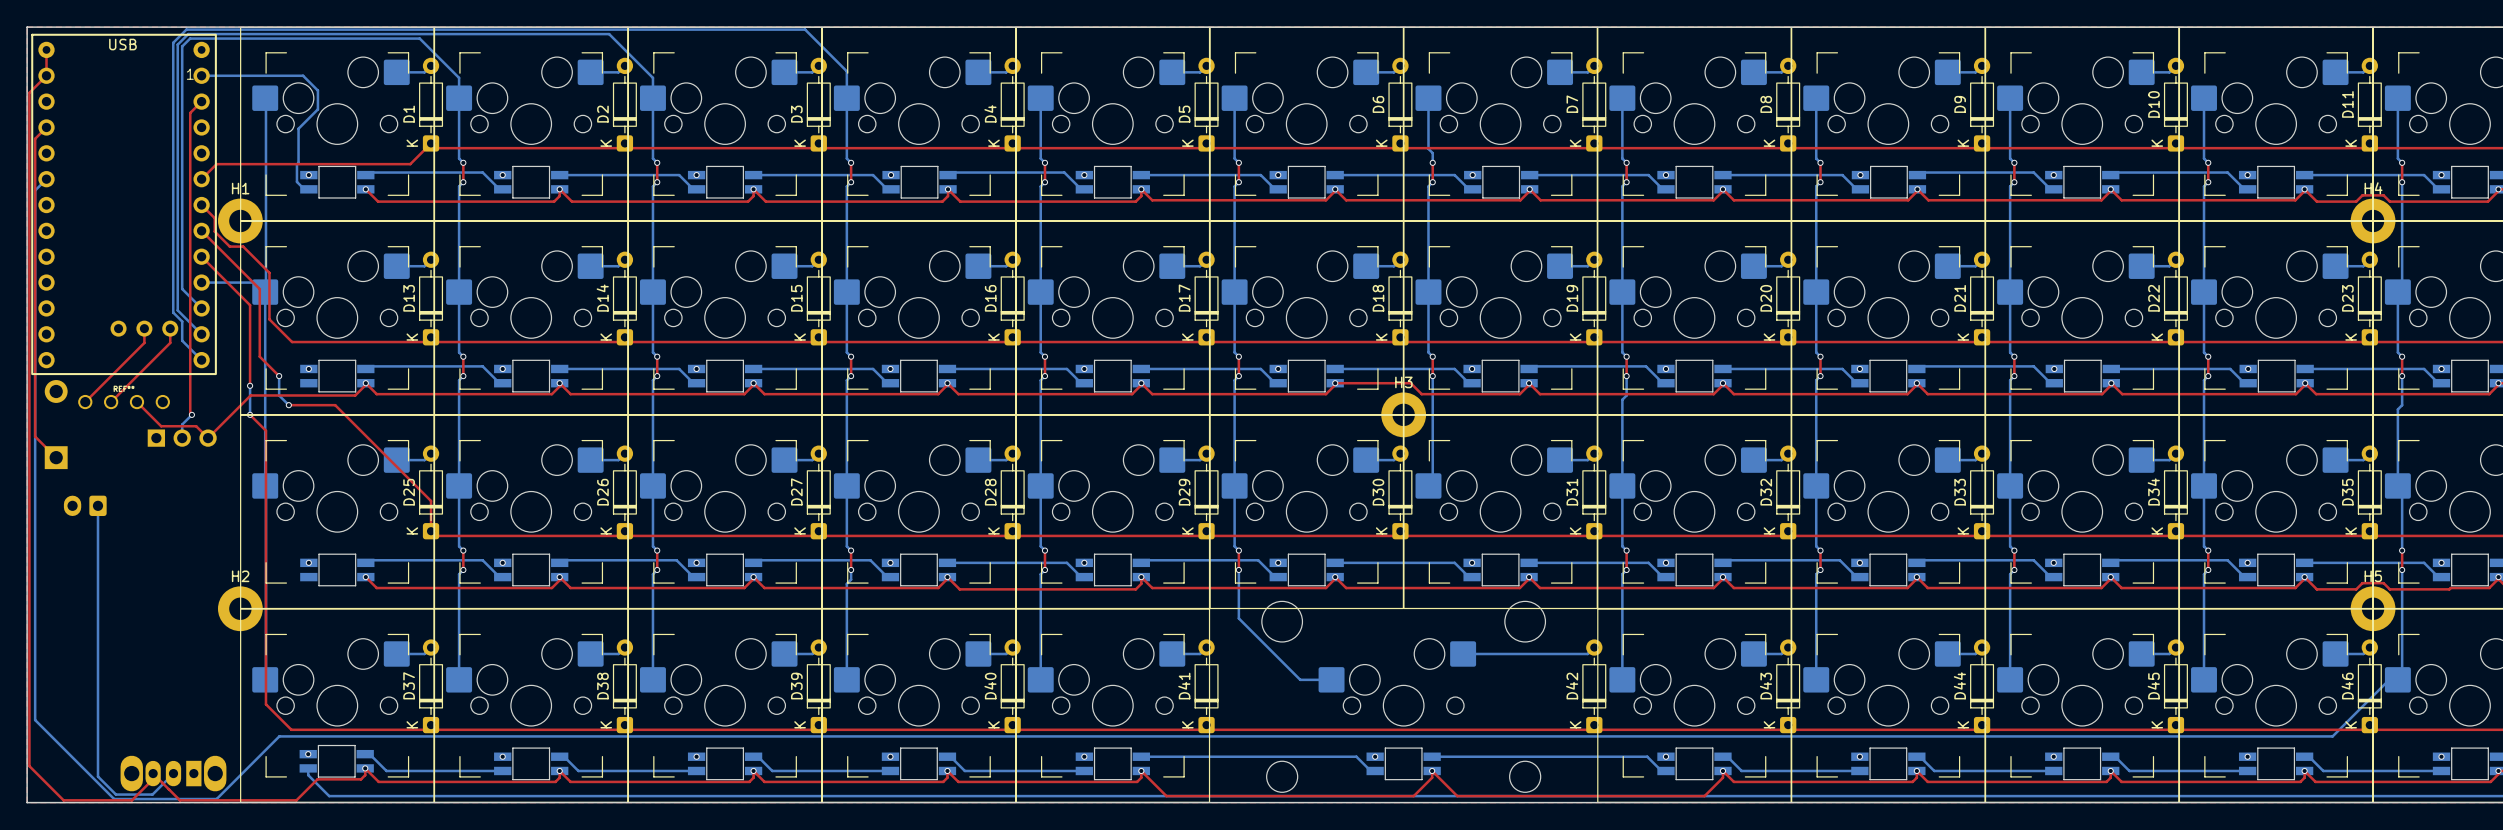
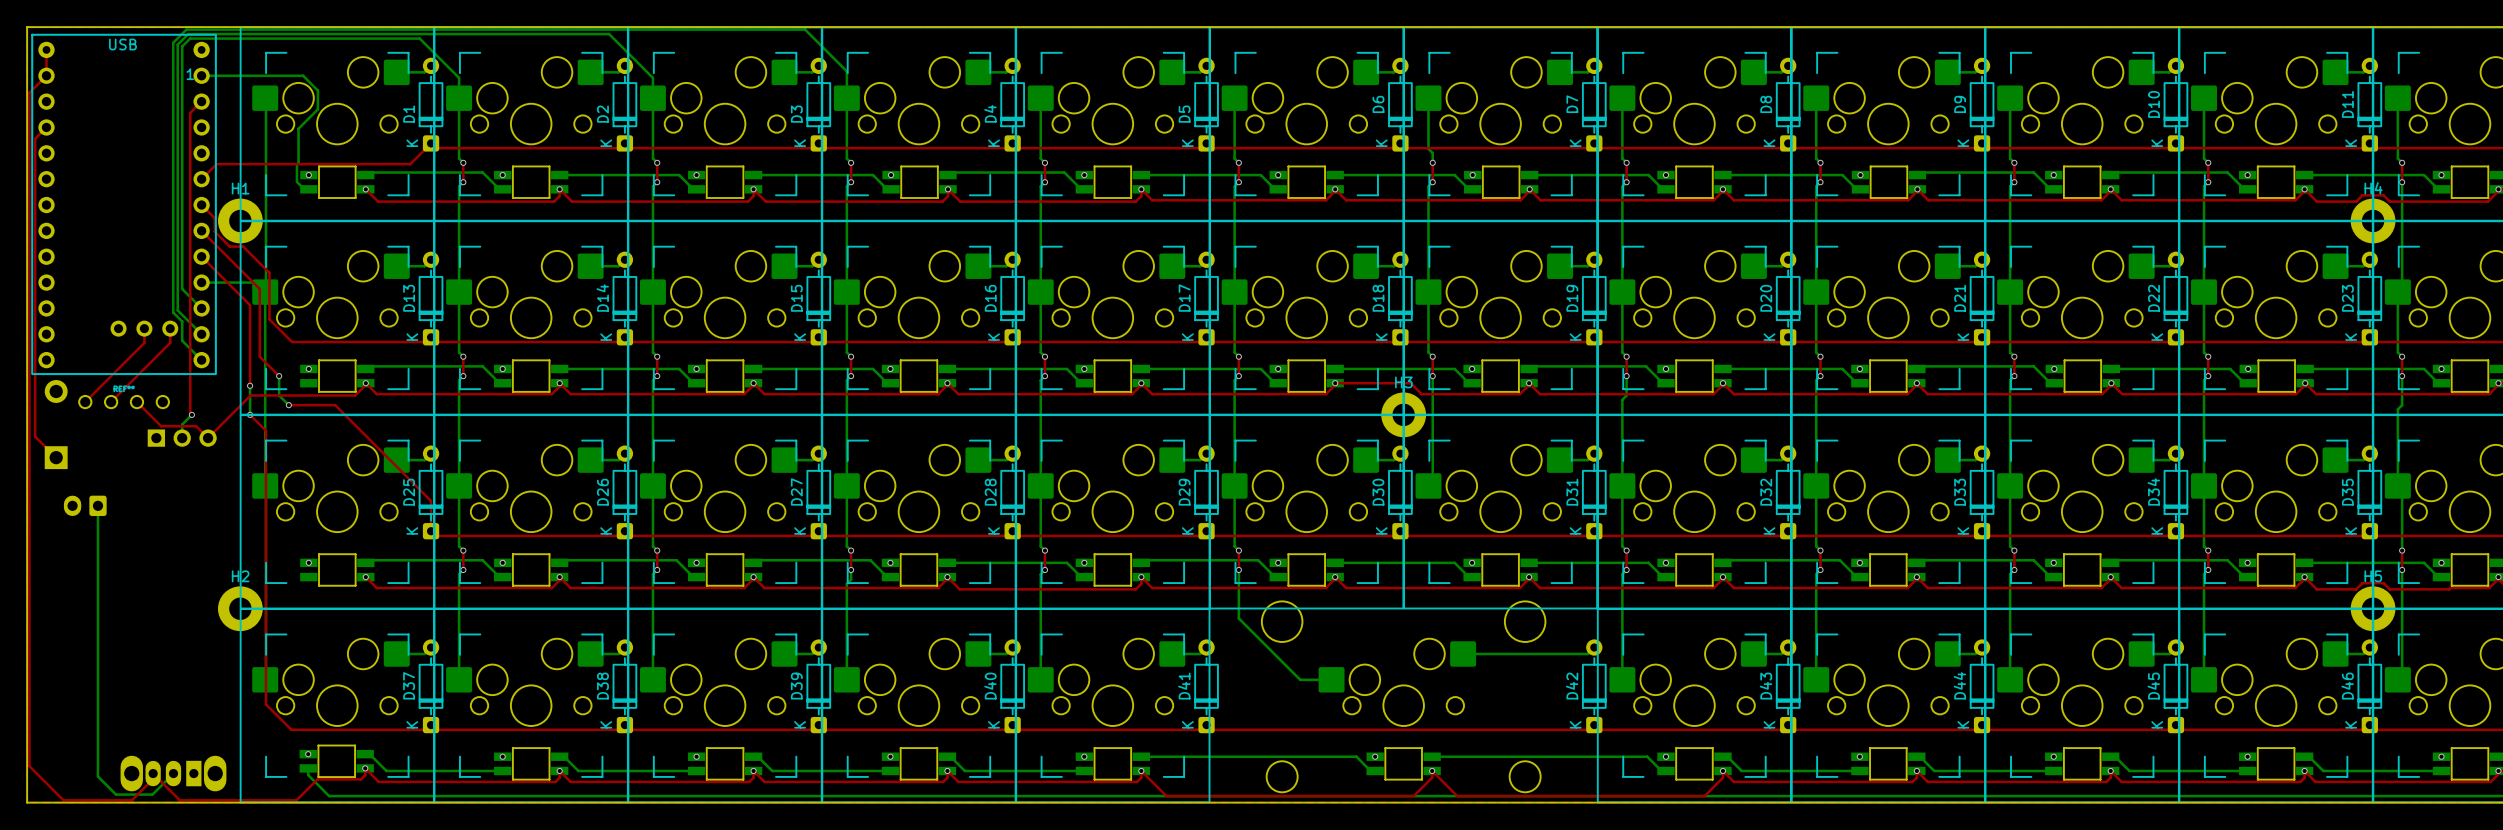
bottom track: (46, 179) (35, 190) (35, 720) (114, 799) (216, 799) (279, 736) (2332, 736) (2389, 679) (2397, 679) -> none

